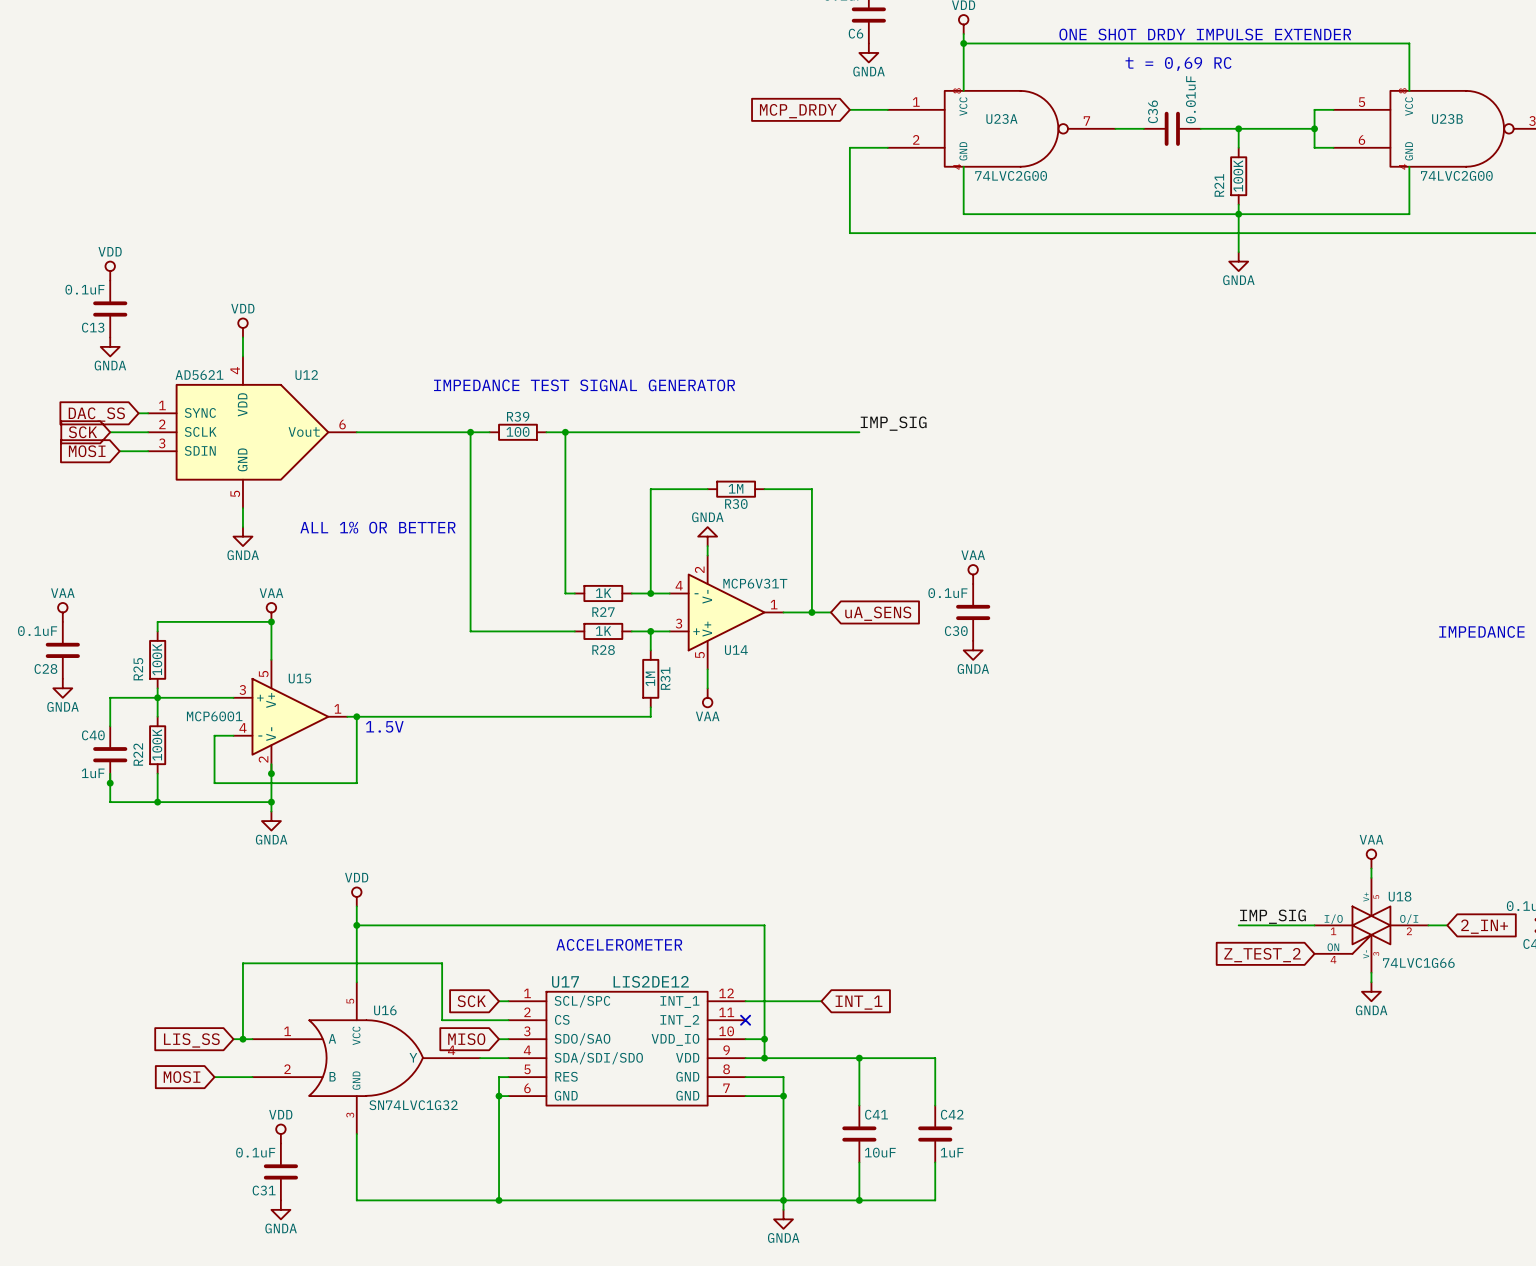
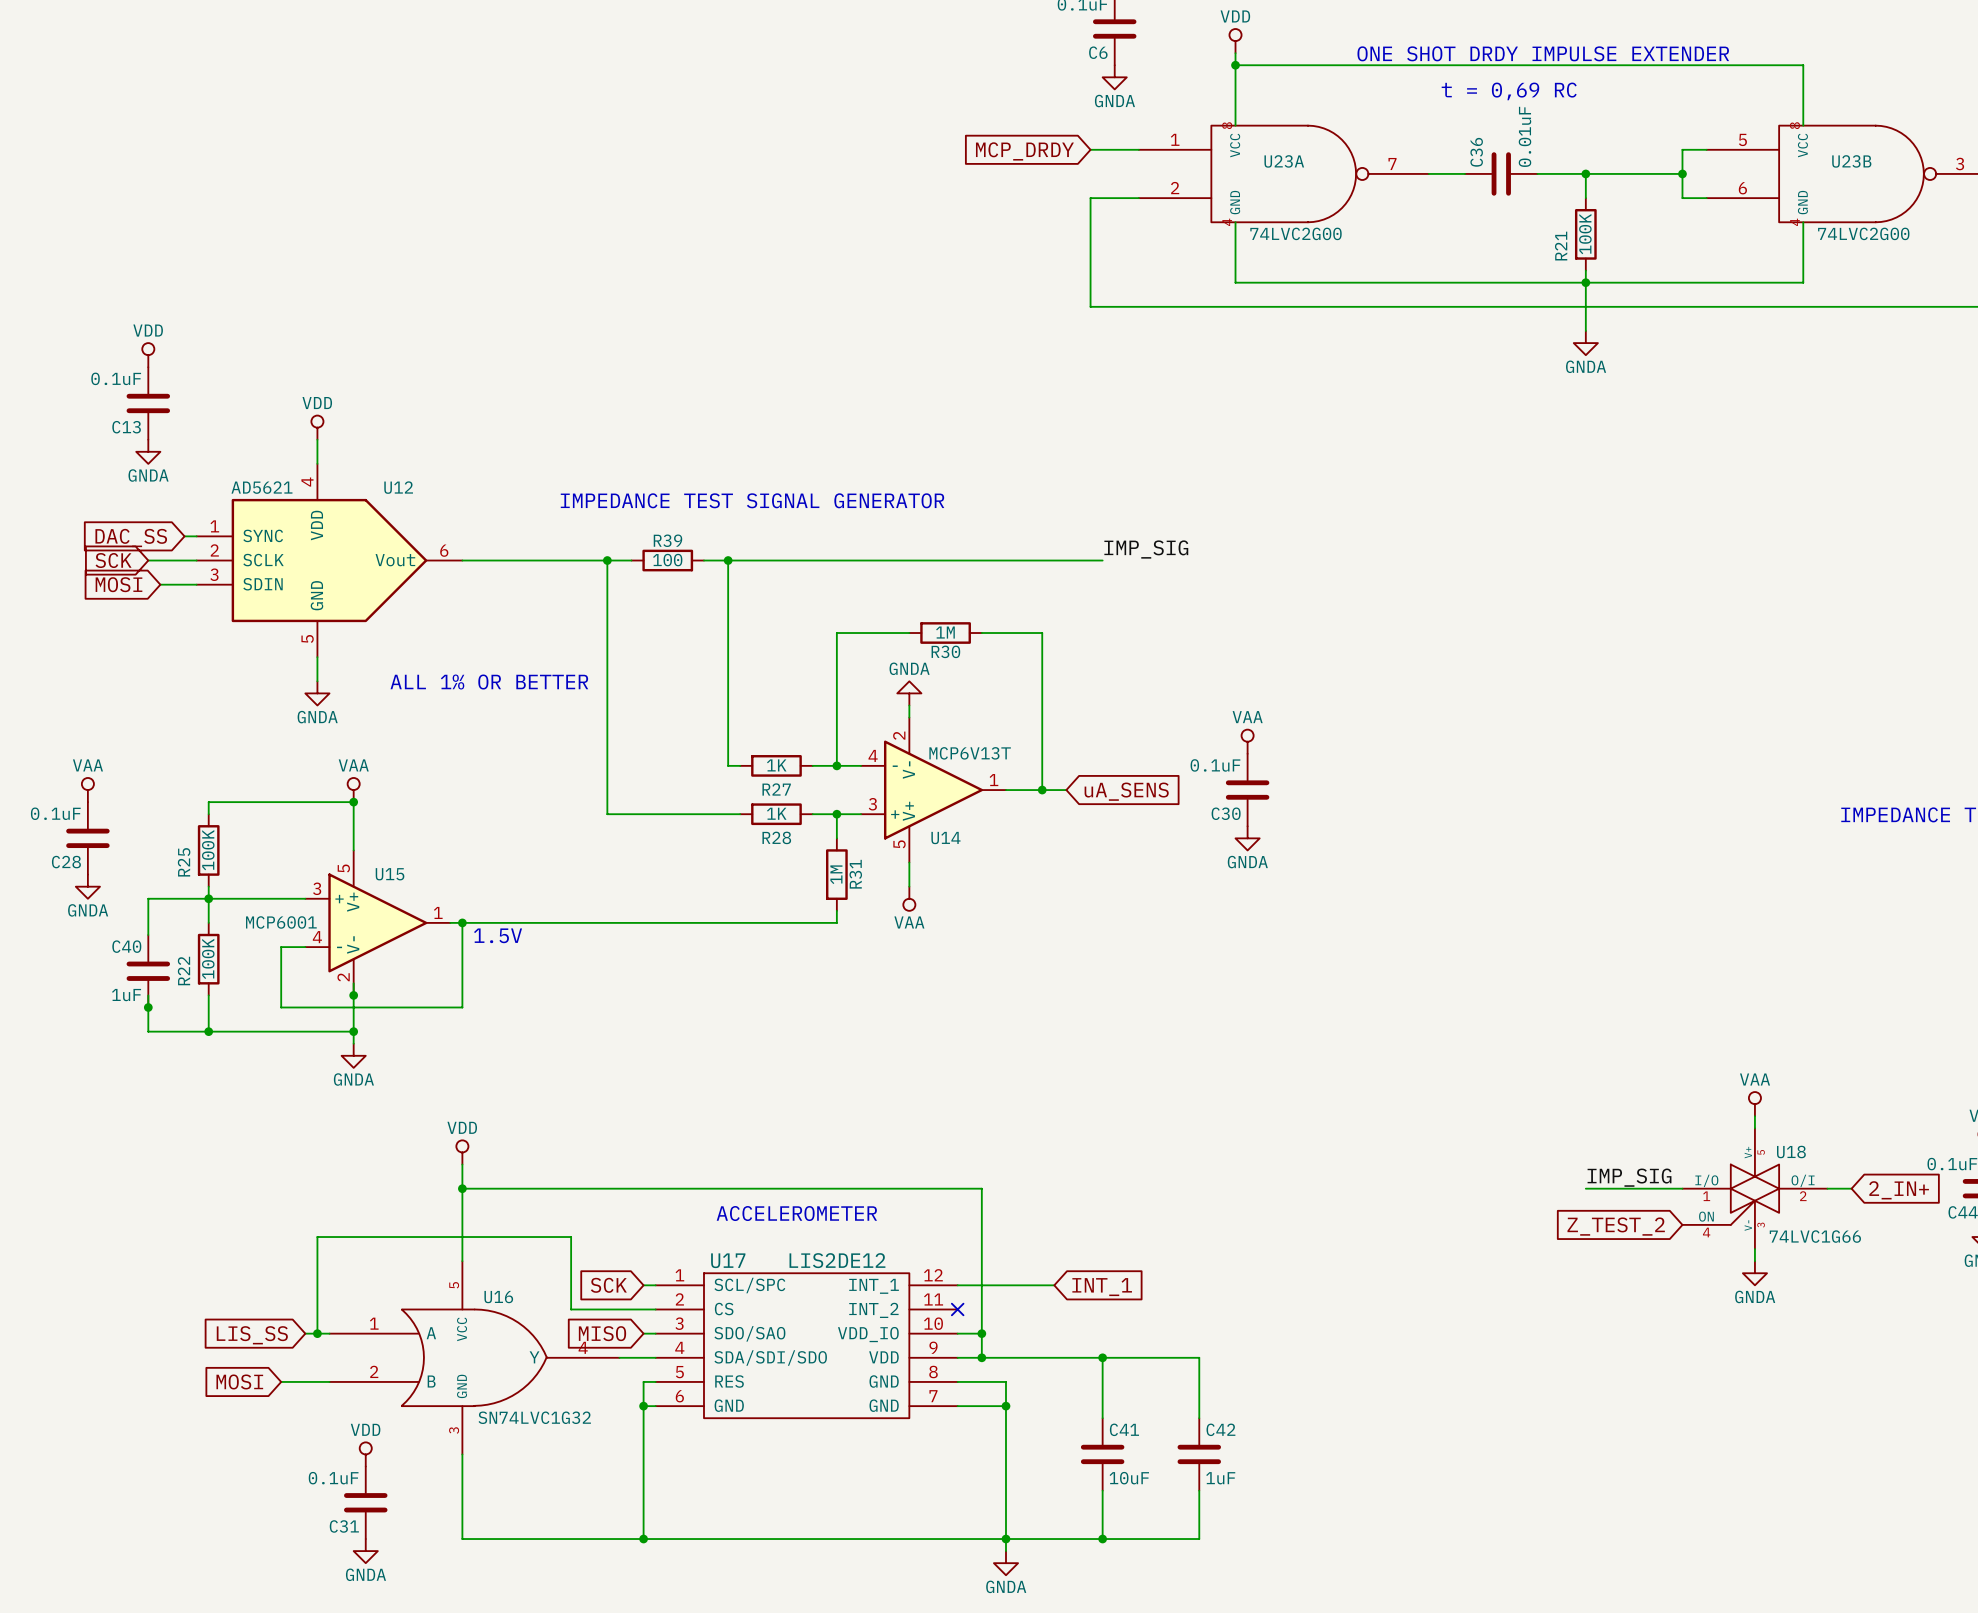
U14 value: MCP6V31T (755, 583) -> MCP6V13T (970, 753)

